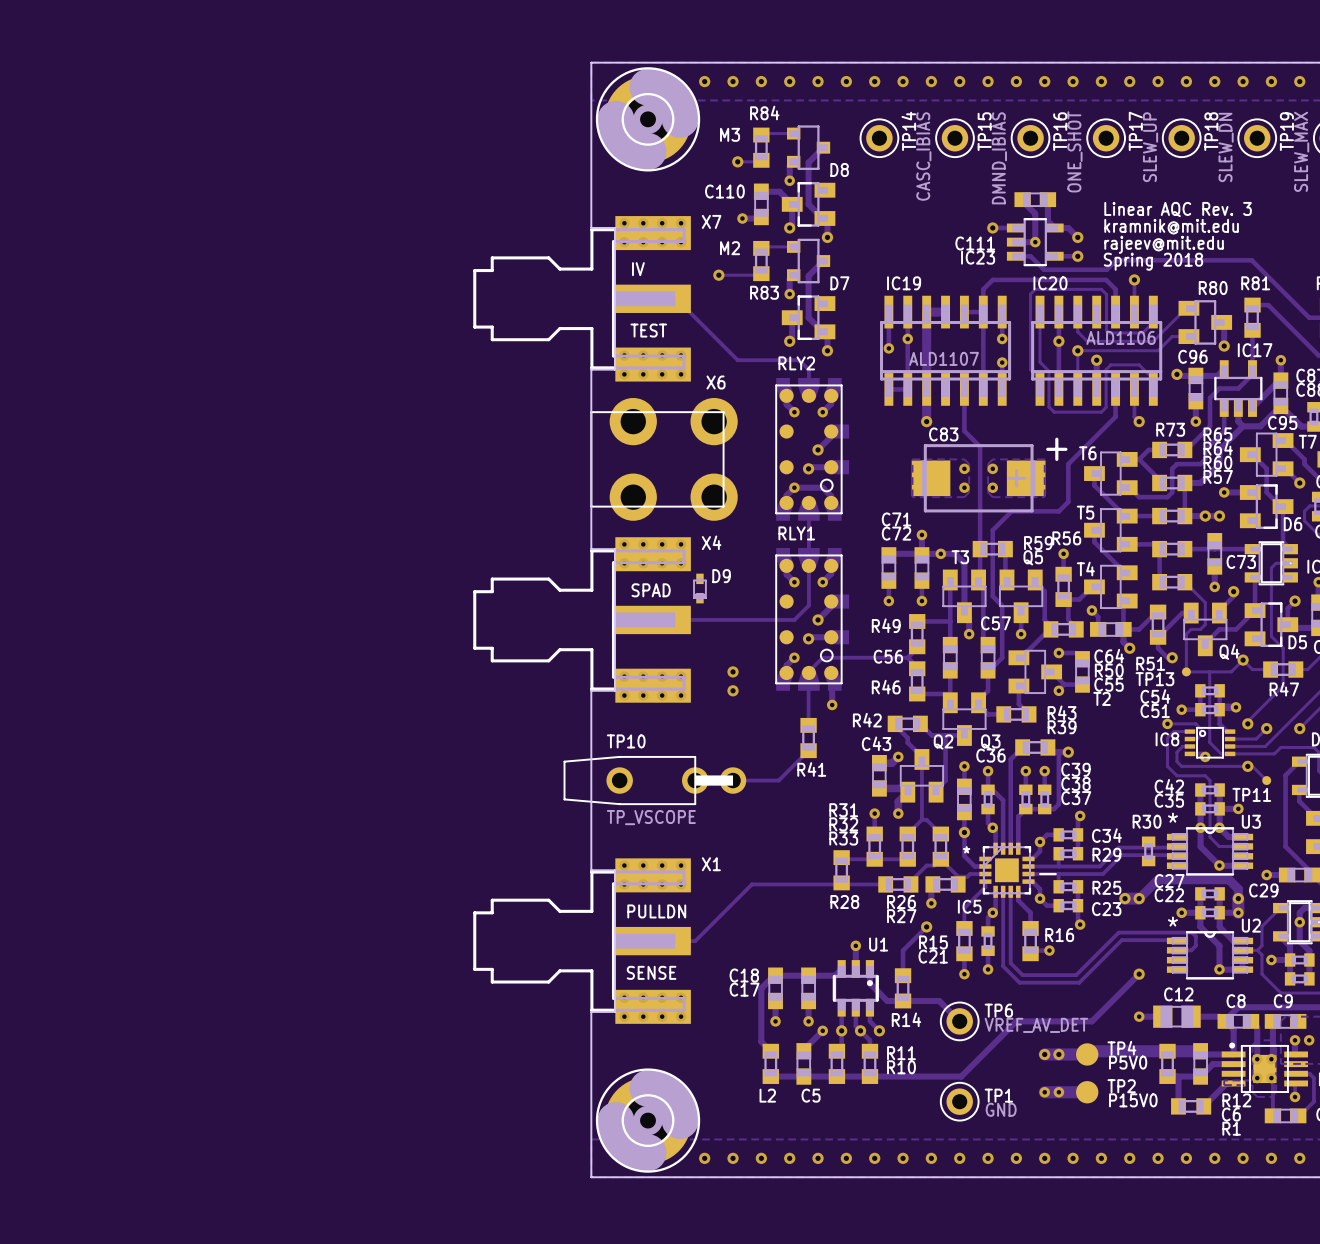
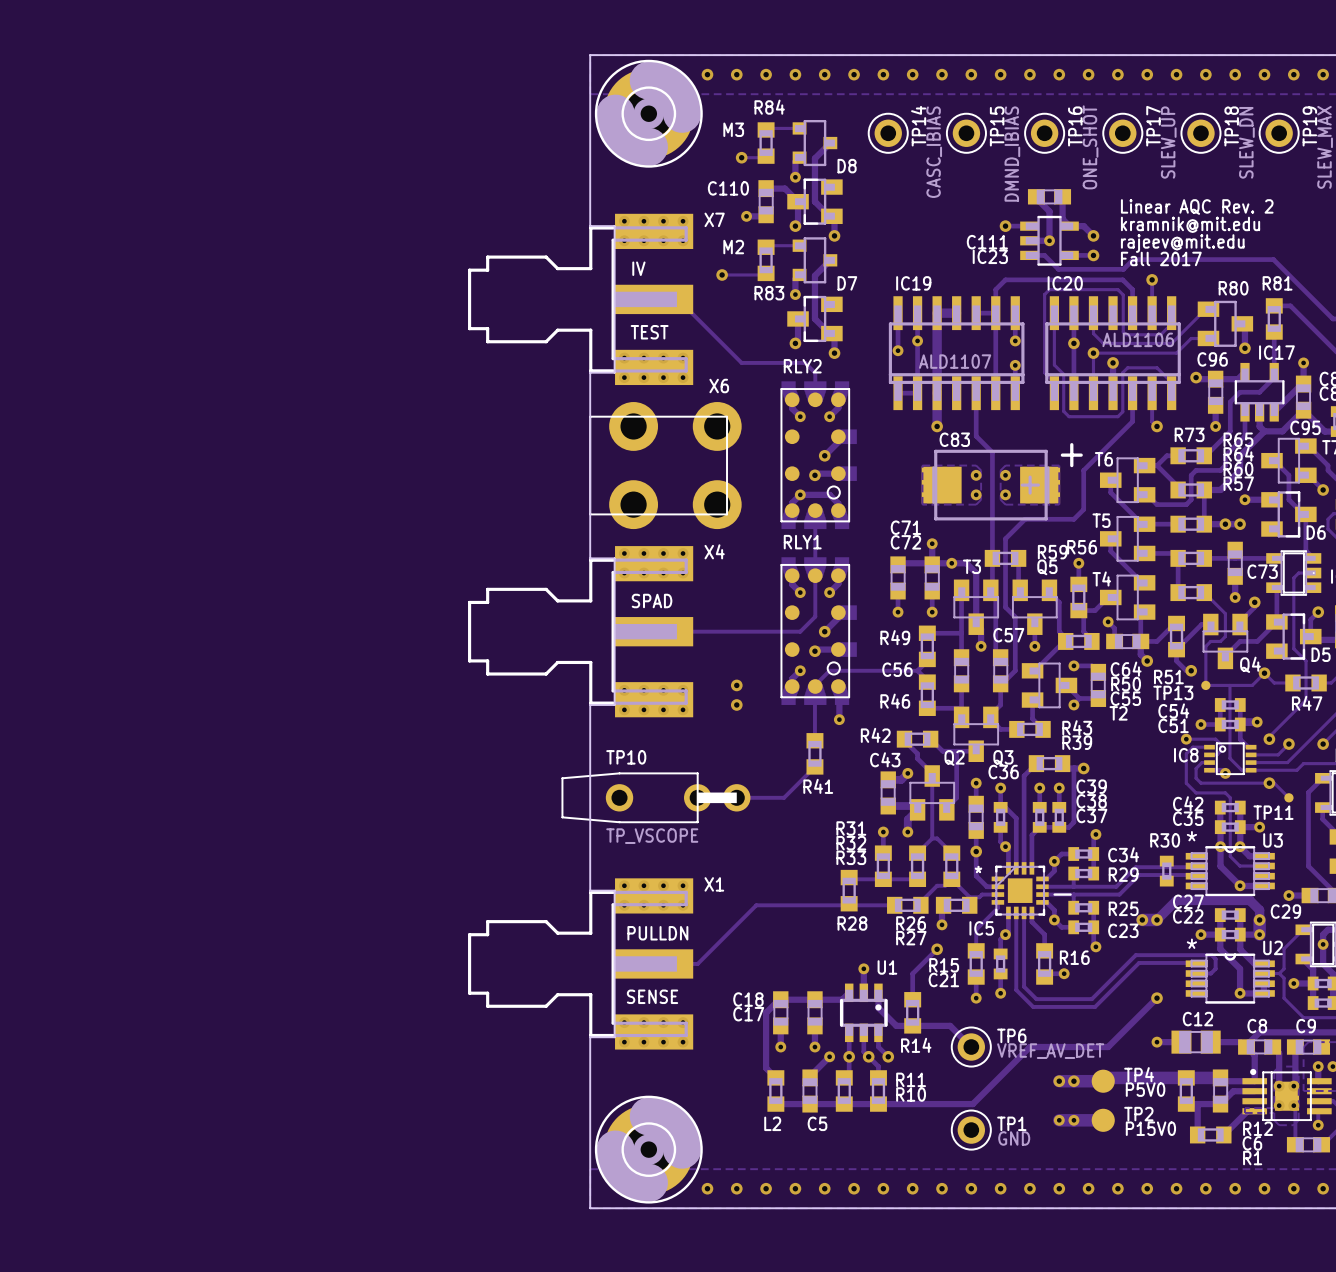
text: Linear AQC Rev. 3 (1178, 209) -> Linear AQC Rev. 2 (1197, 207)
text: Spring 2018 (1153, 261) -> Fall 2017 (1161, 258)
D9: (699, 588) -> none

